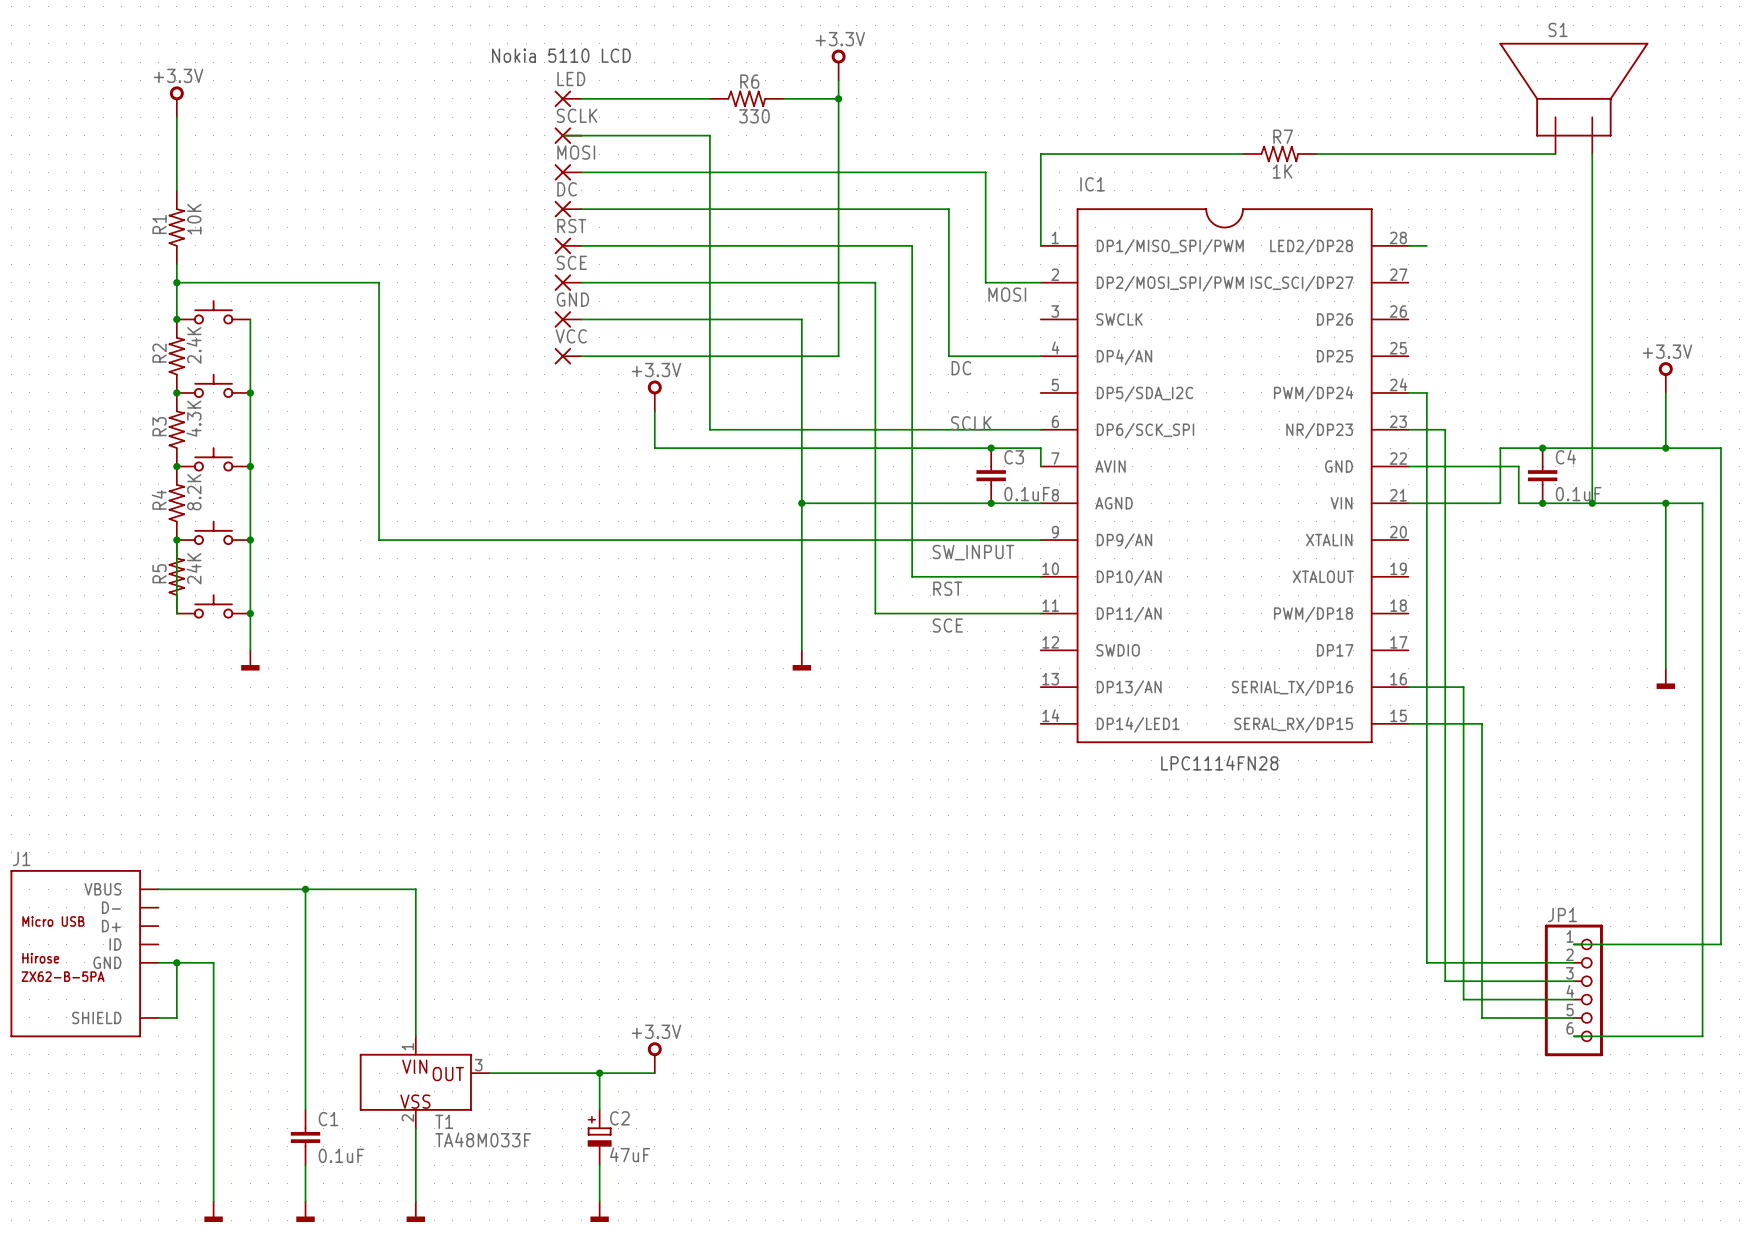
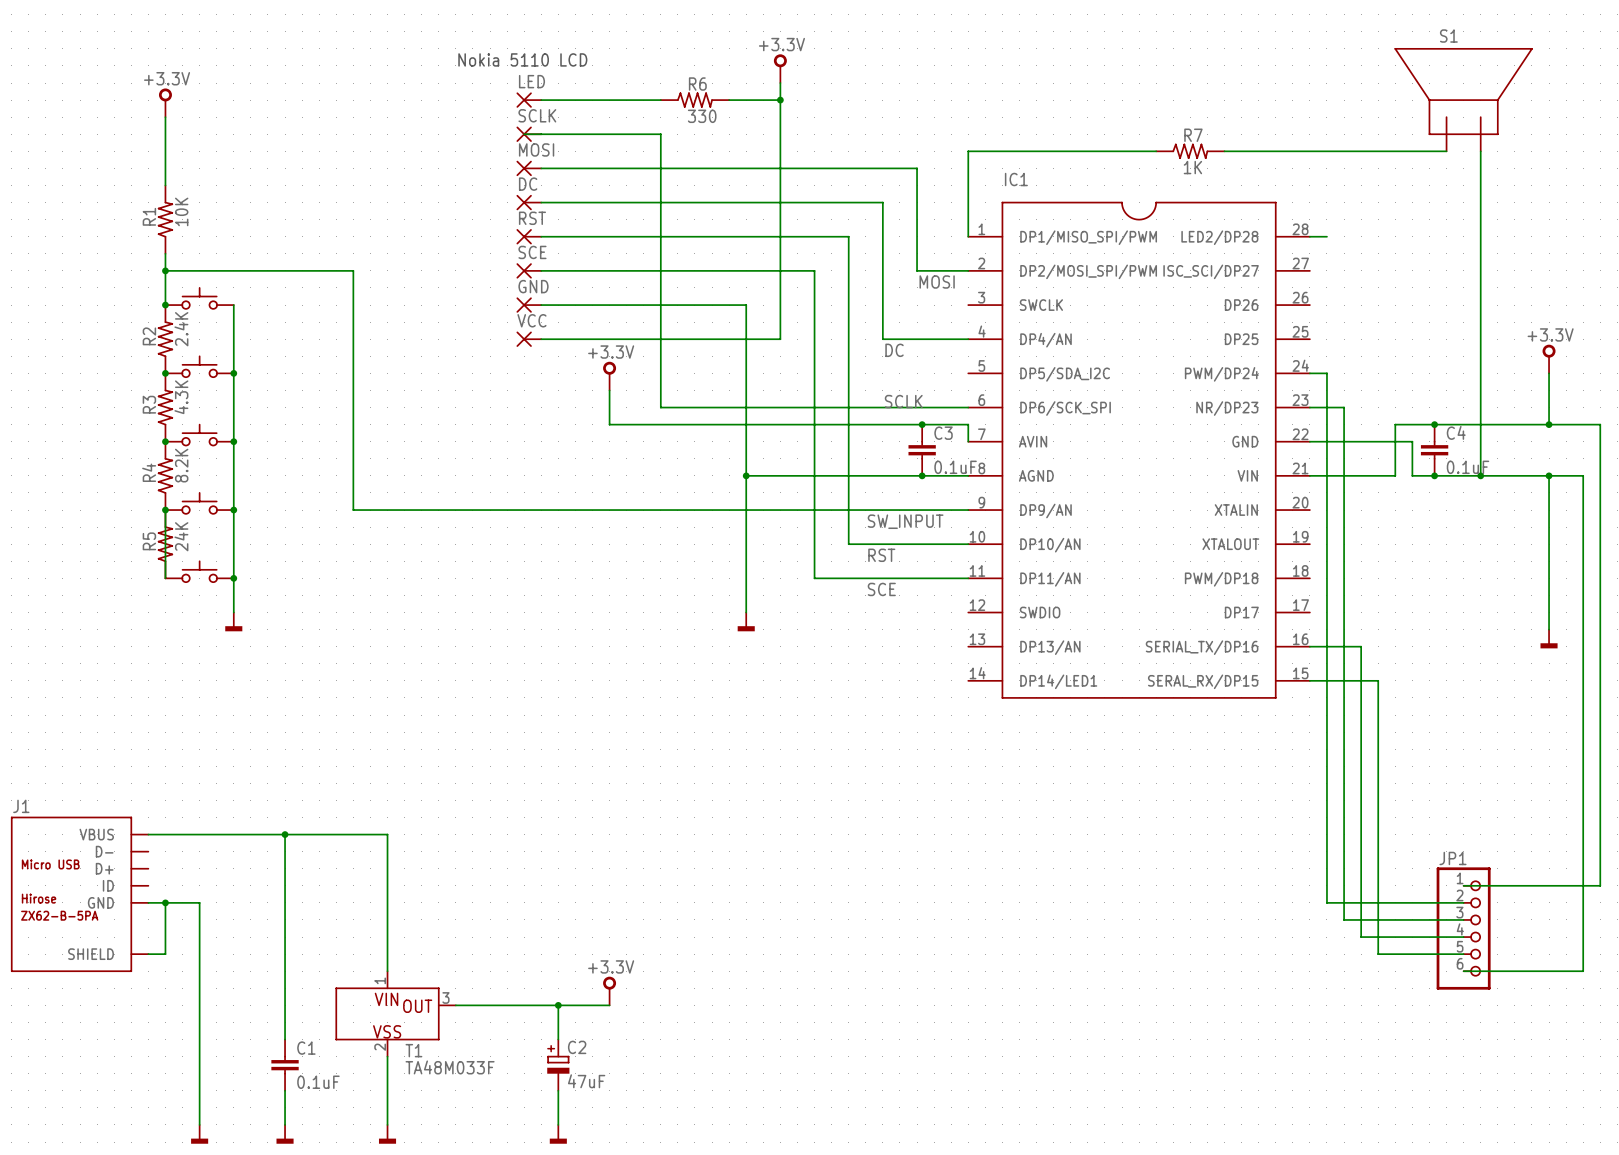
text: LPC1114FN28 (1219, 763) -> none

